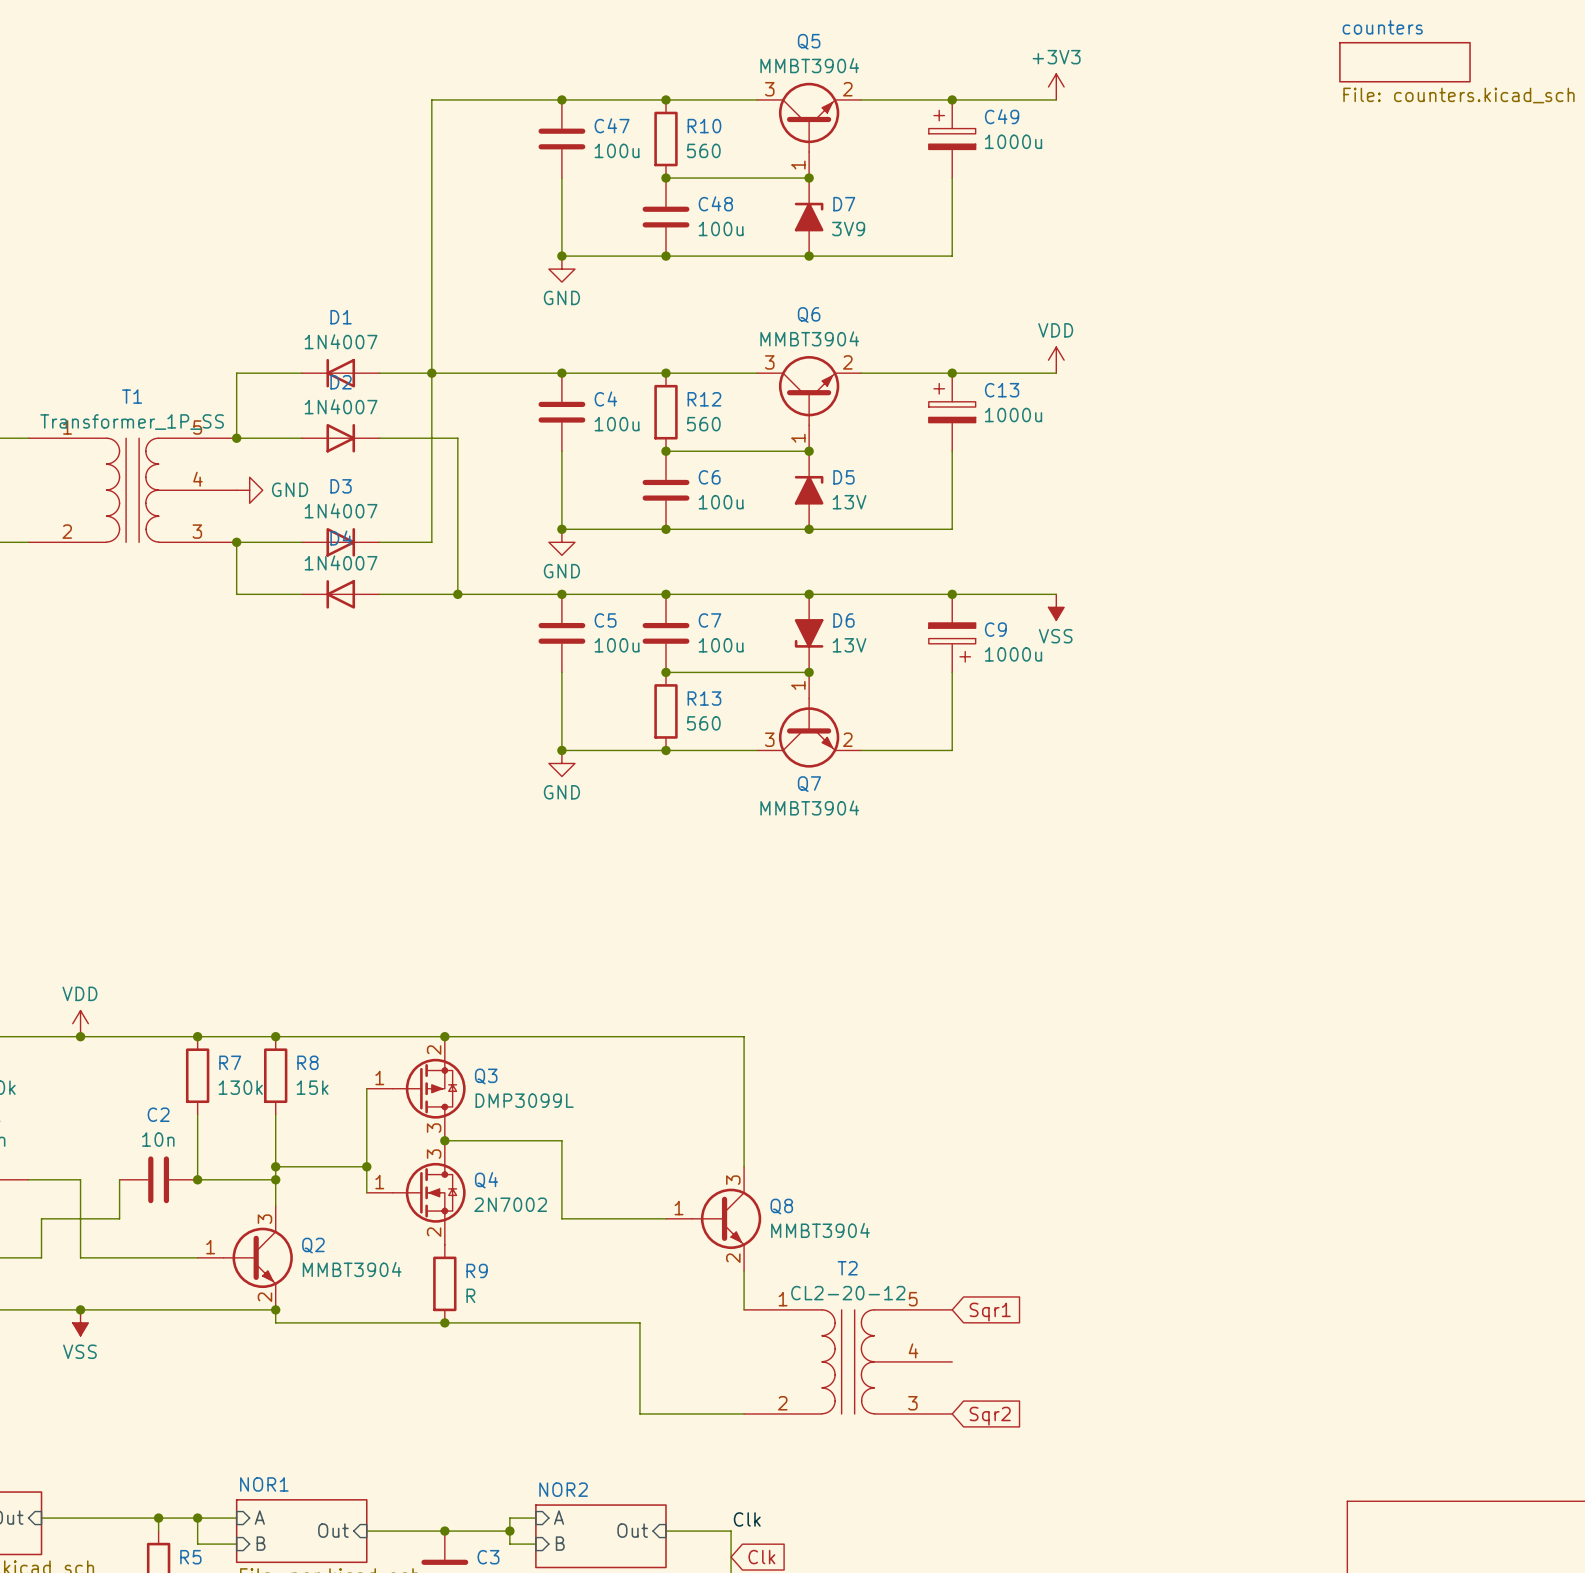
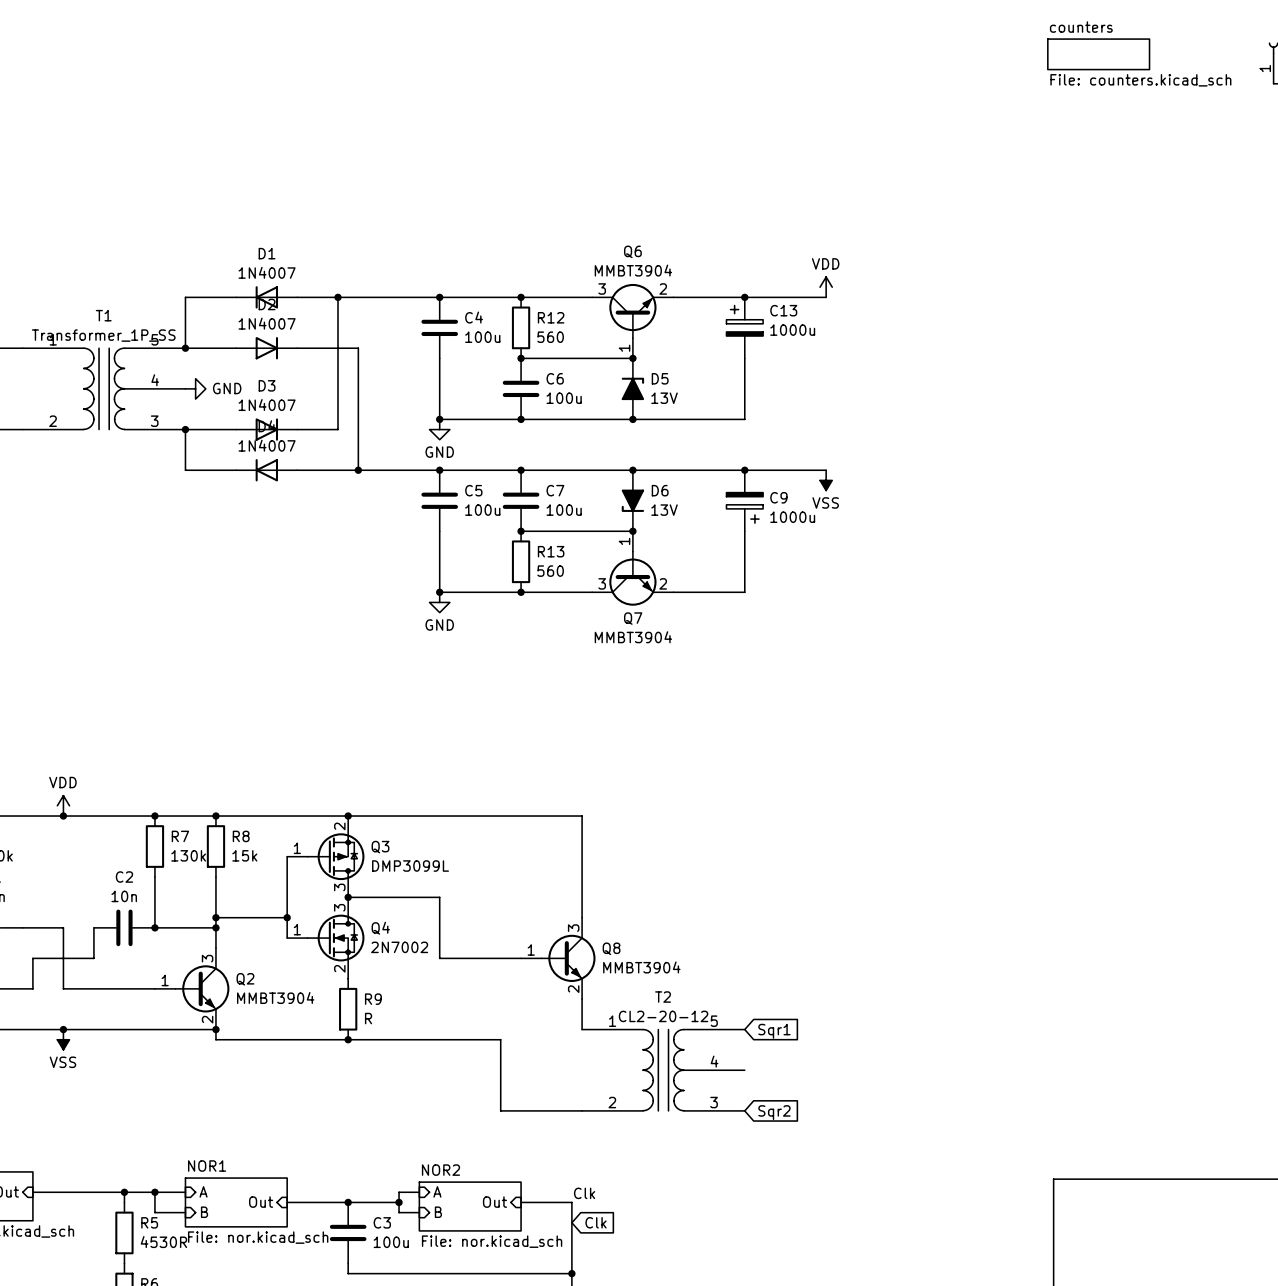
power symbol: +3V3 (1056, 86) -> none
junction: (561, 99) -> none
junction: (666, 99) -> none
wire: (757, 99) (431, 99) (431, 373) -> none
wire: (861, 99) (1056, 99) -> none
junction: (952, 99) -> none
Q5: MMBT3904 (809, 130) -> none
C47: 100u (561, 139) -> none
R10: 560 (666, 139) -> none
C49: 1000u (952, 139) -> none
wire: (561, 178) (561, 256) (952, 256) (952, 178) -> none
wire: (666, 178) (809, 178) -> none
junction: (666, 178) -> none
junction: (809, 178) -> none
C48: 100u (666, 217) -> none
D7: 3V9 (809, 217) -> none
junction: (561, 256) -> none
junction: (666, 256) -> none
junction: (809, 256) -> none
power symbol: GND (561, 269) -> none

